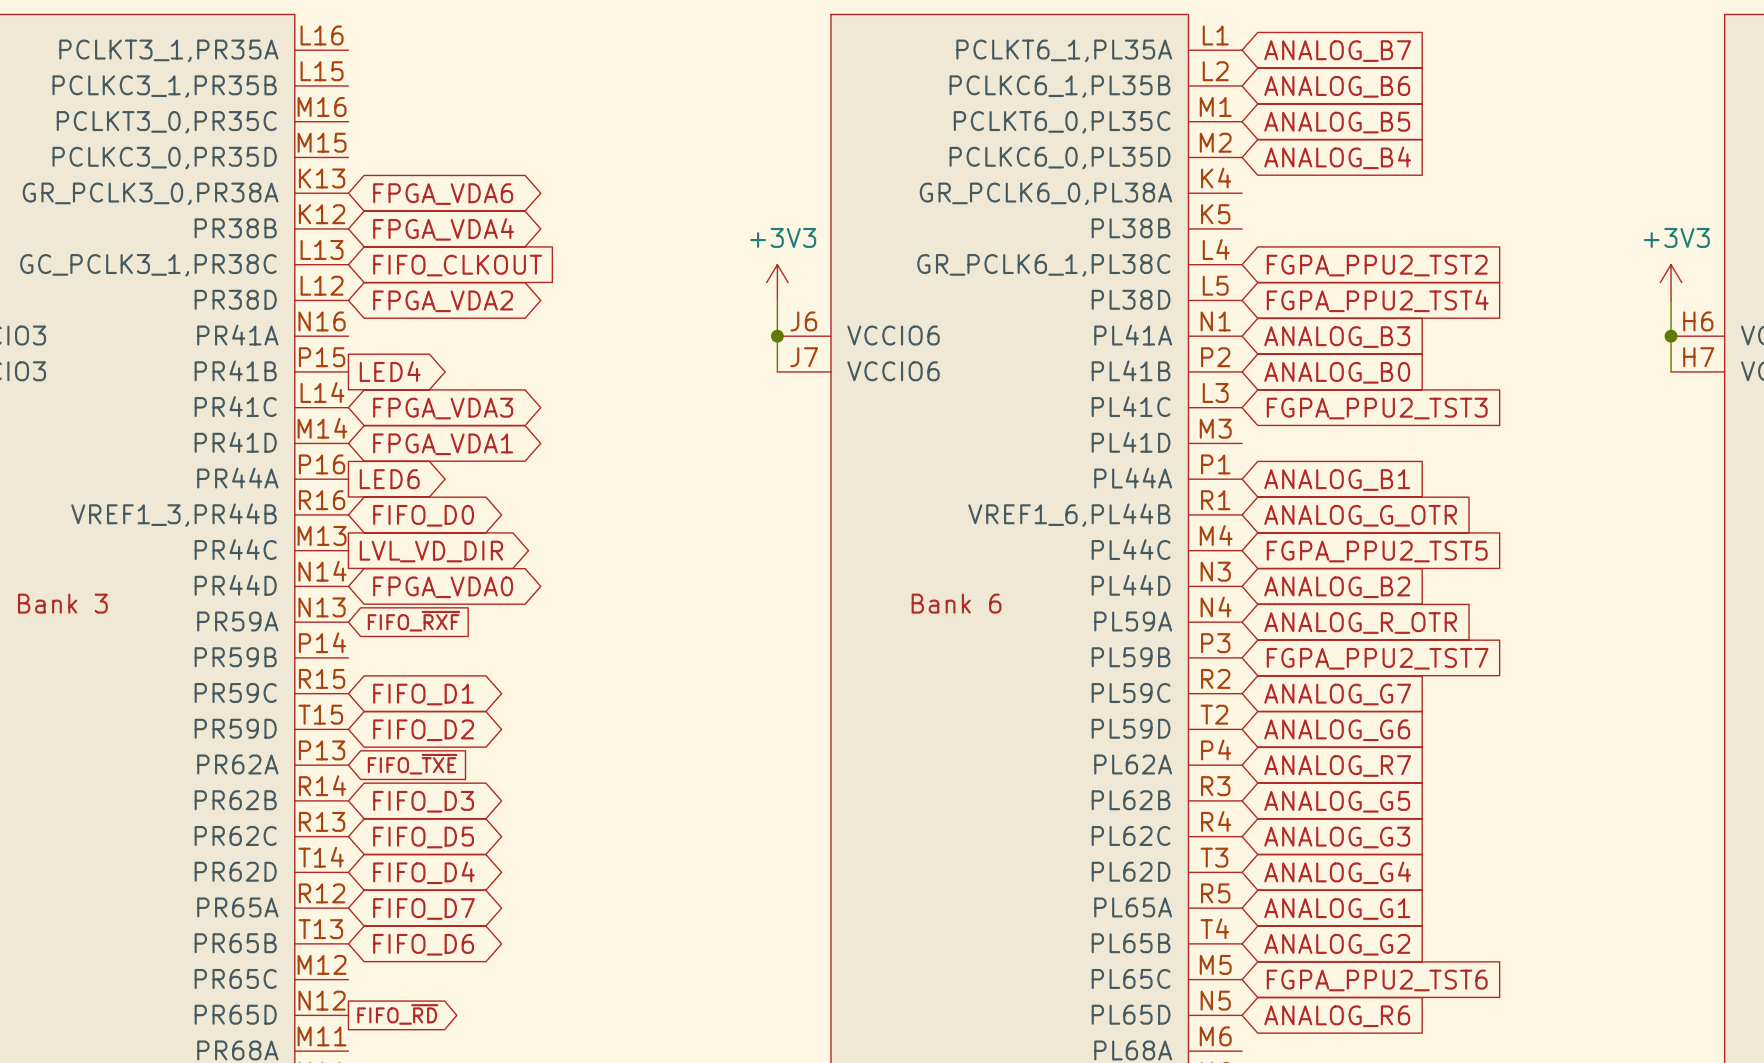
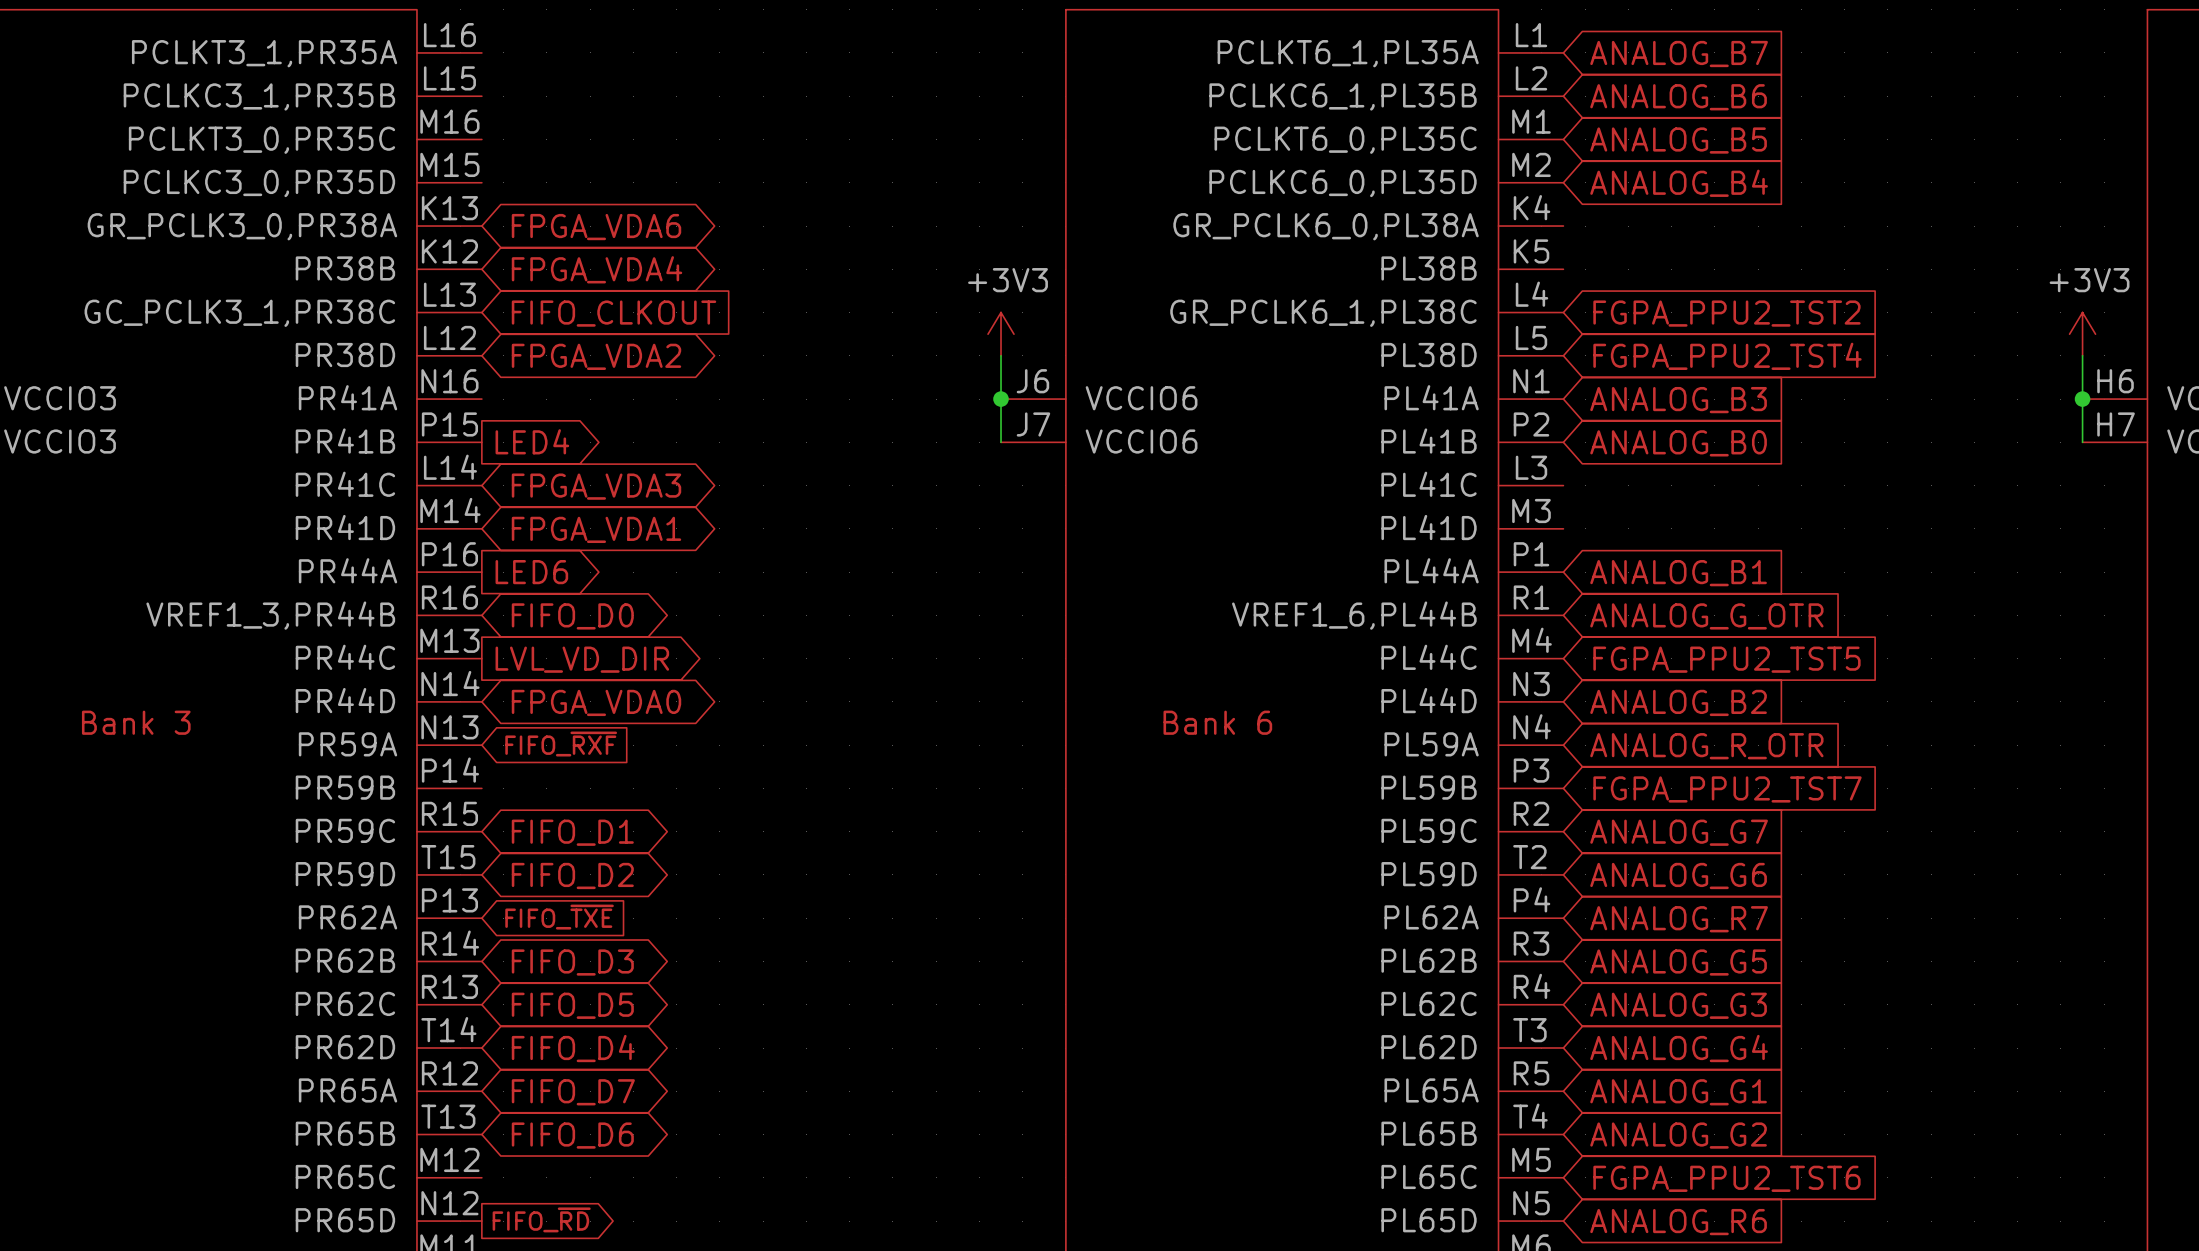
global label: FGPA_PPU2_TST3 (1377, 408) -> none

